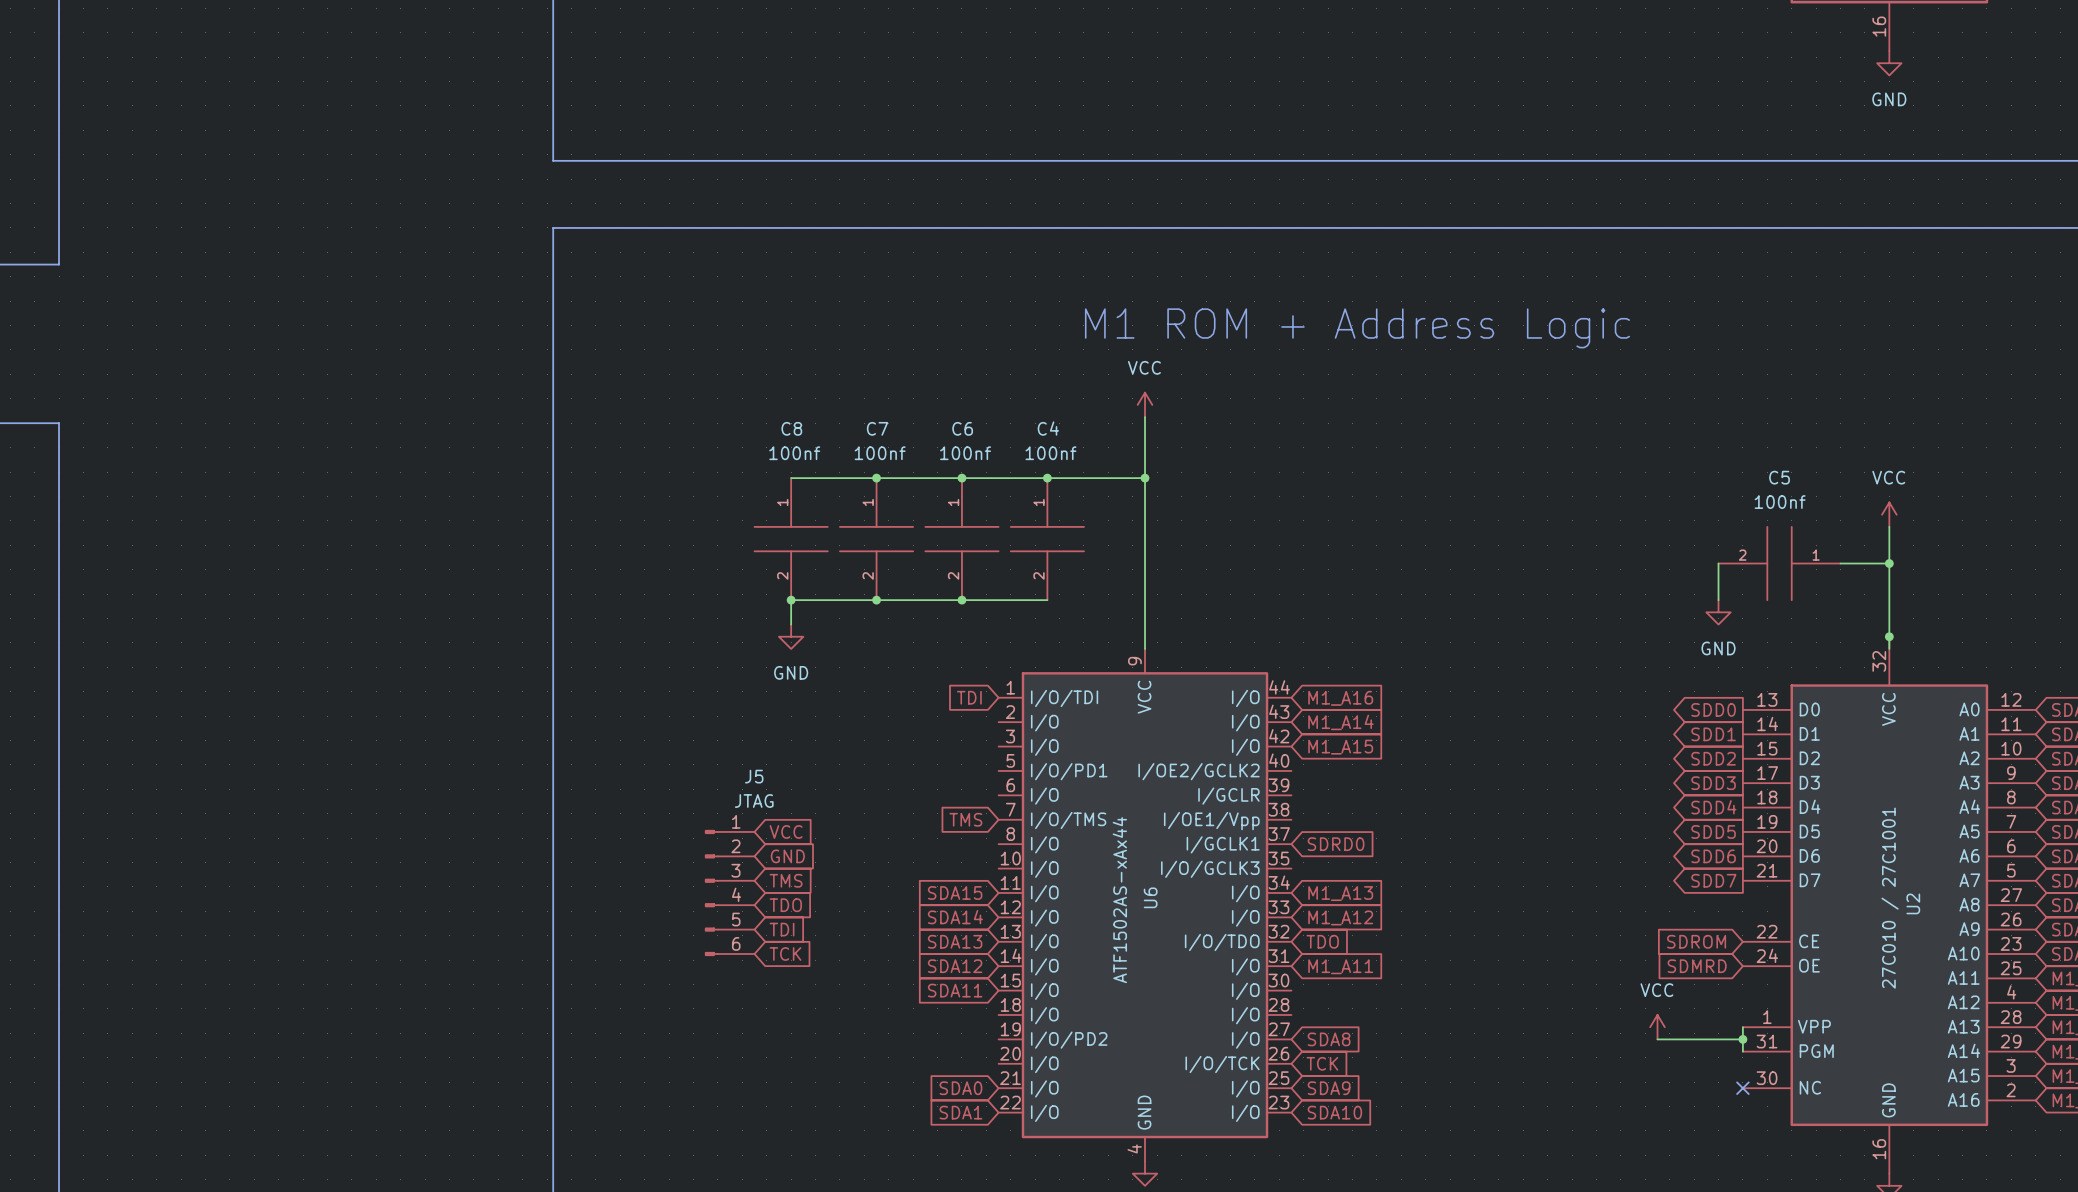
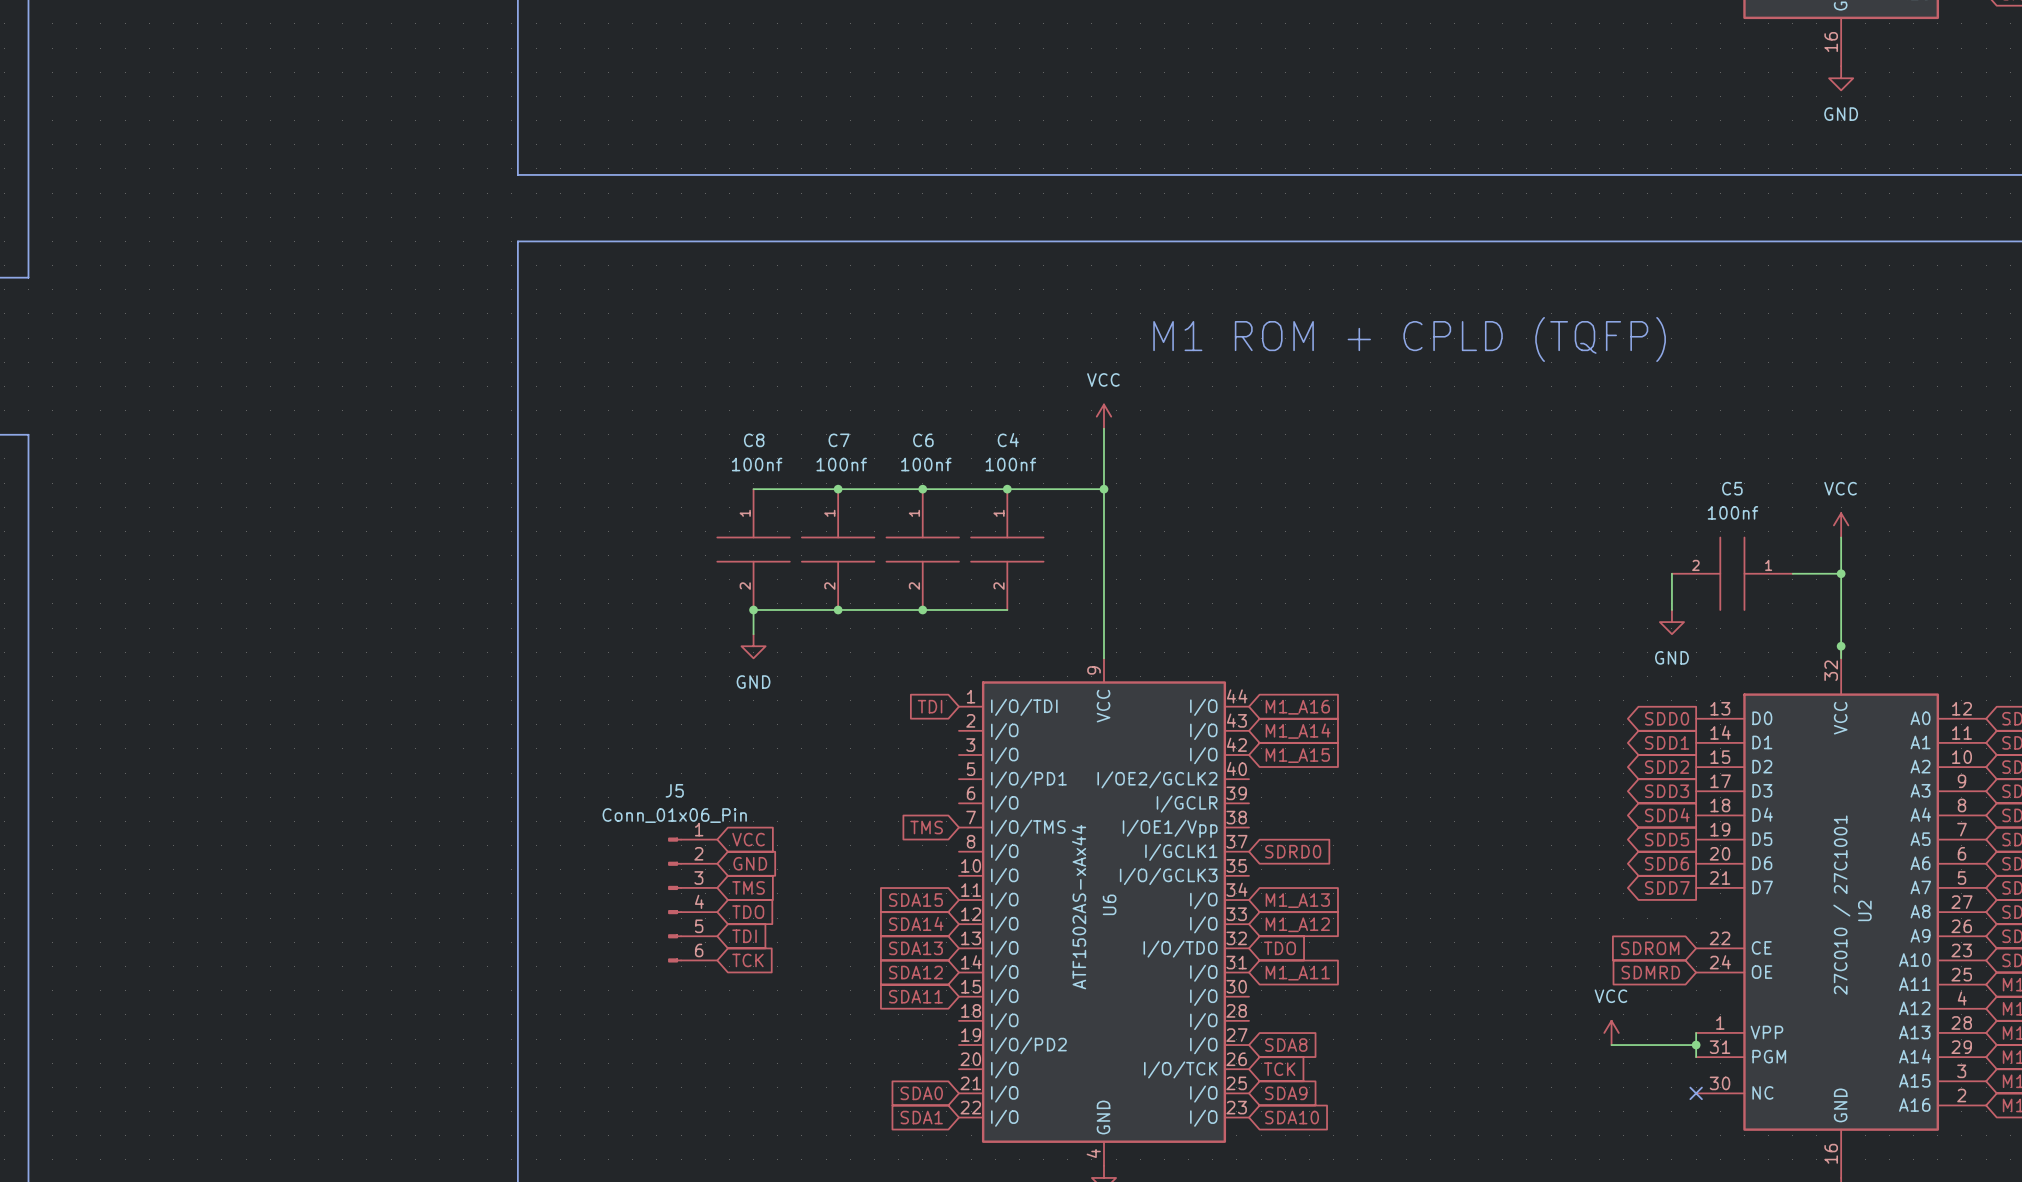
text: none -> M1 ROM + CPLD (TQFP) (1409, 339)
text: M1 ROM + Address Logic (1357, 328) -> none
J5 name position: J5 (754, 776) -> J5 (674, 790)
J5 value: JTAG (754, 801) -> Conn_01x06_Pin (674, 815)

